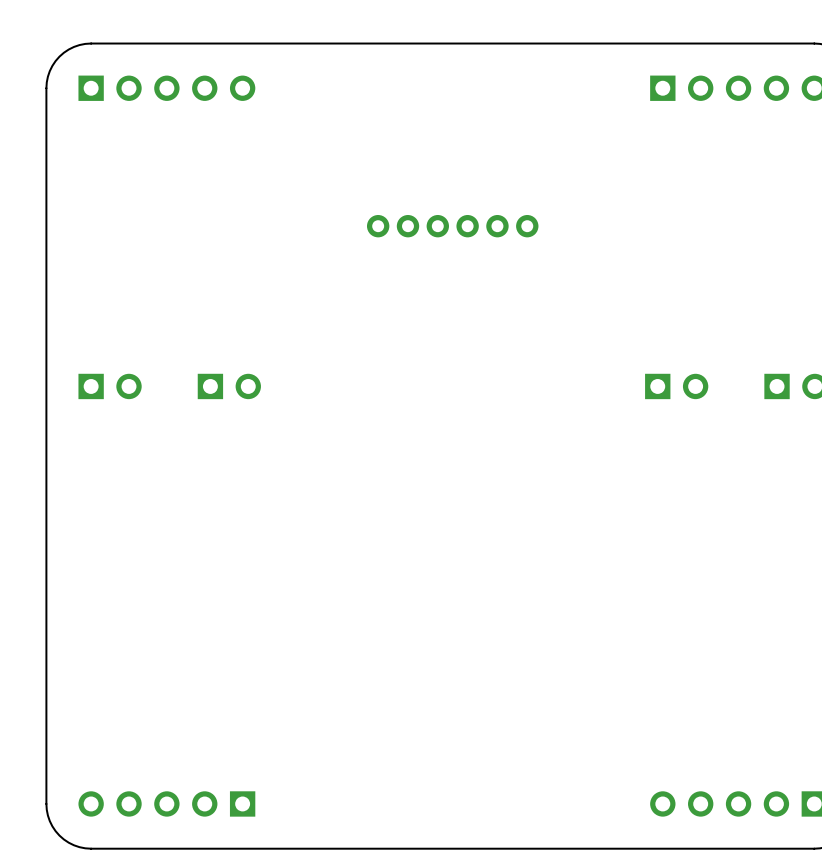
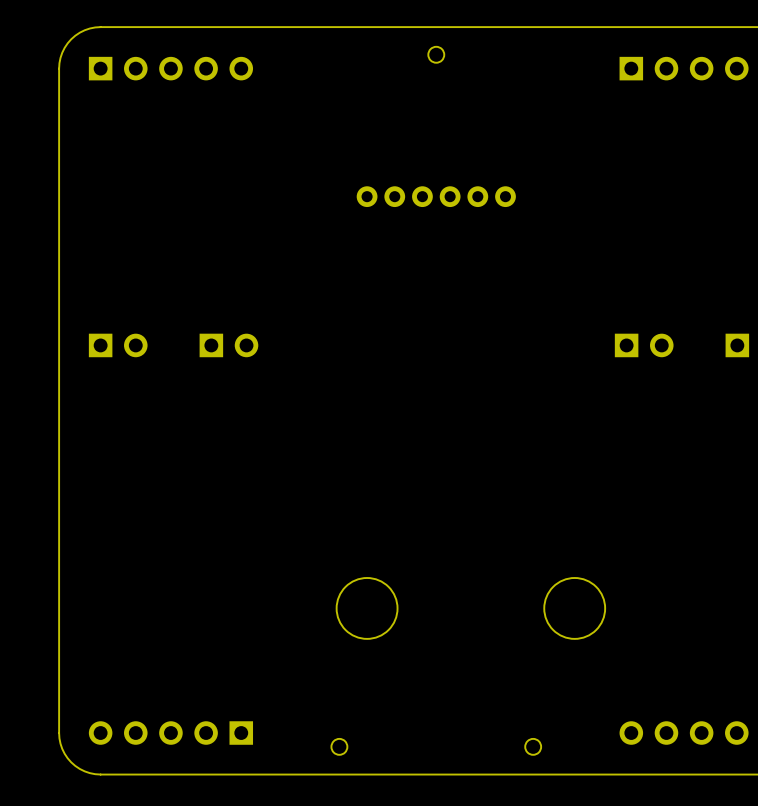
round board edge: none -> [427, 46, 445, 64]
round board edge: none -> [335, 577, 399, 640]
round board edge: none -> [543, 577, 606, 640]
round board edge: none -> [330, 738, 349, 756]
round board edge: none -> [524, 738, 542, 756]

